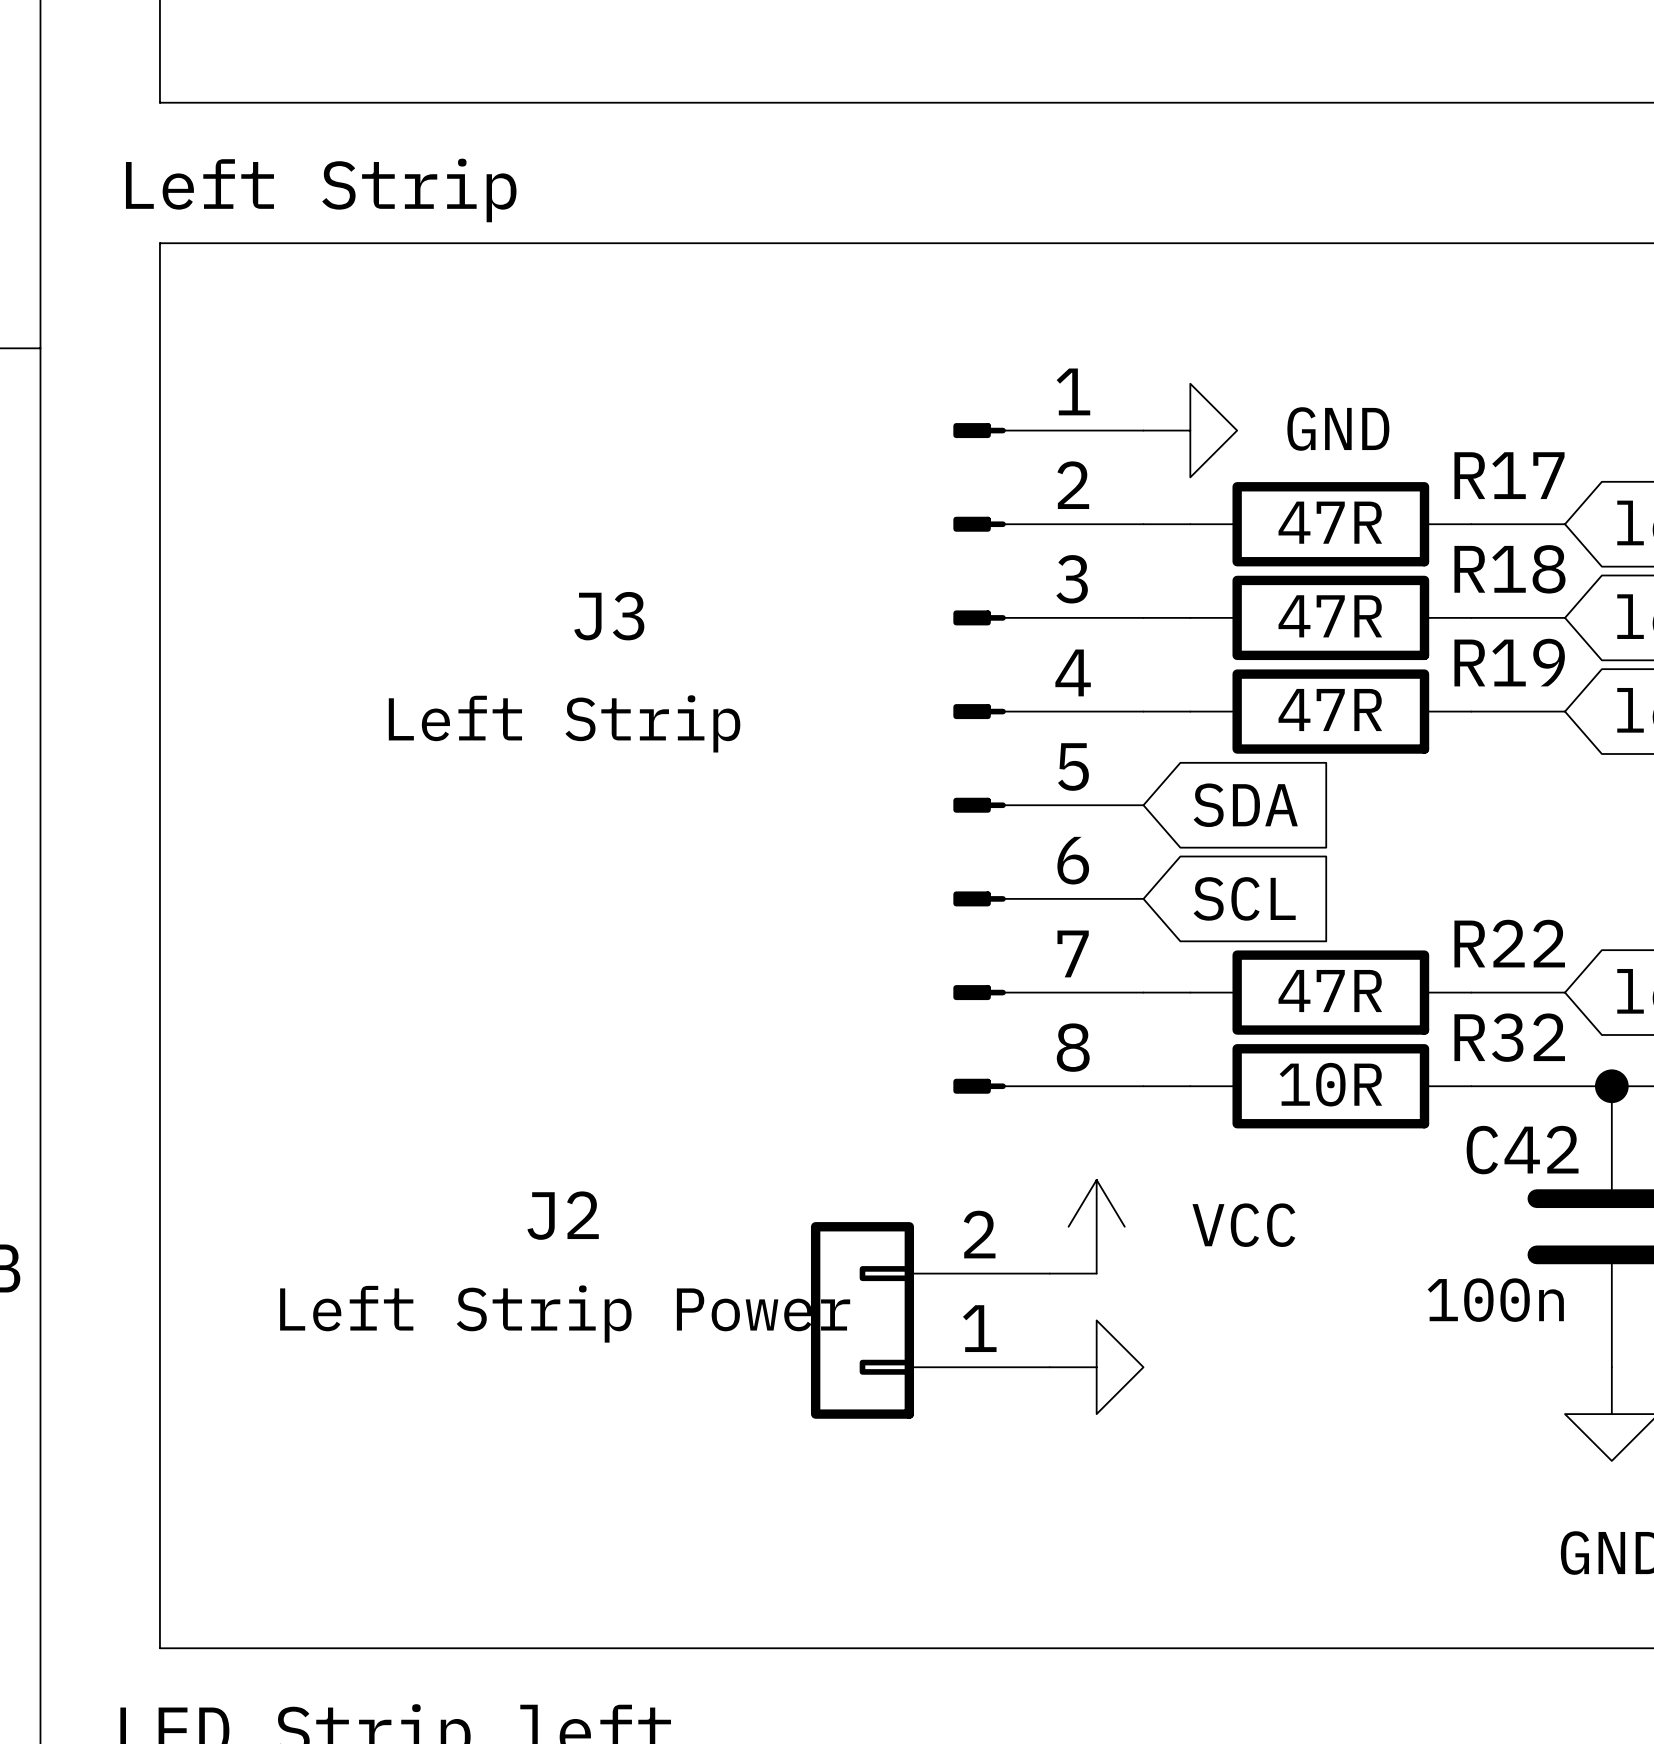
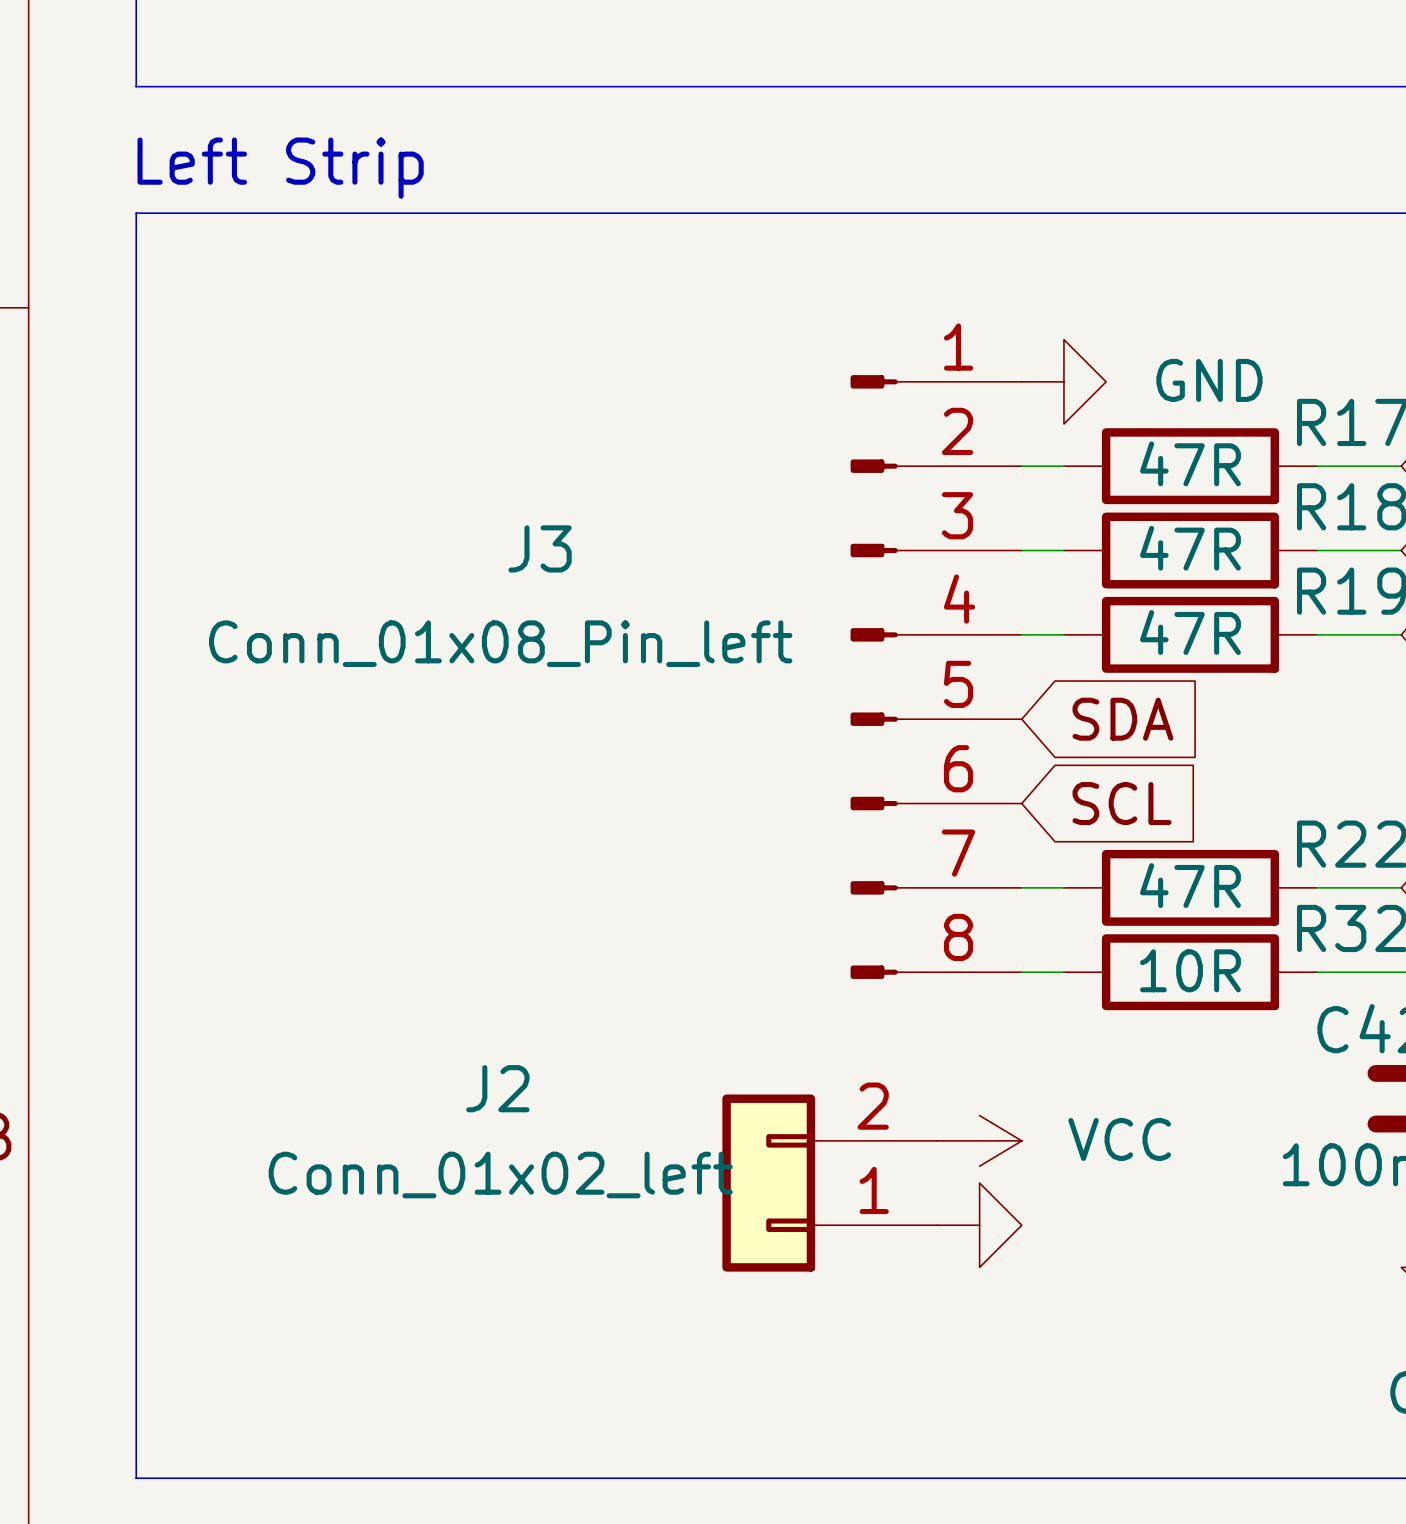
J3 value: Left Strip (564, 723) -> Conn_01x08_Pin_left (500, 643)
power symbol rotation: 0° (1096, 1226) -> 90° clockwise (979, 1140)
J2 value: Left Strip Power (565, 1314) -> Conn_01x02_left (500, 1175)

